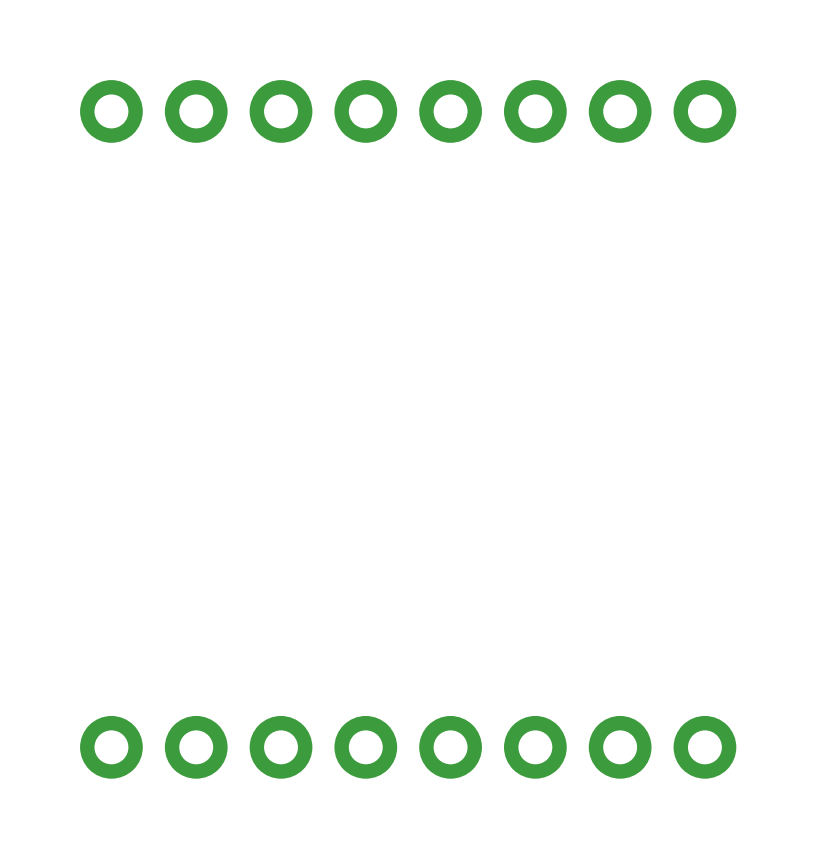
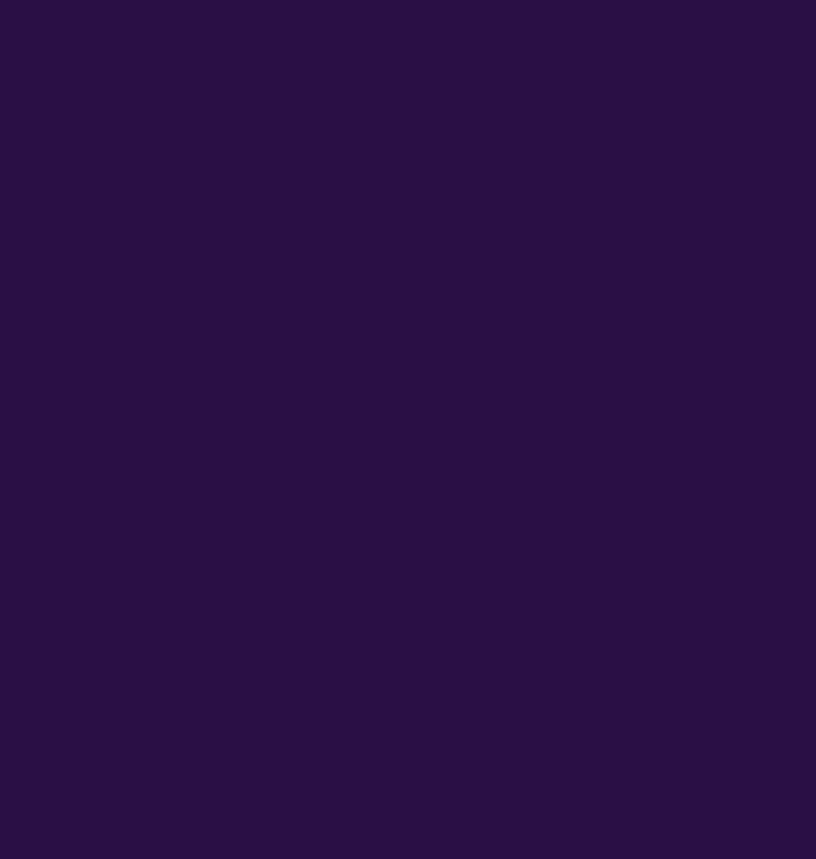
part: (408, 111) -> none
part: (408, 747) -> none

